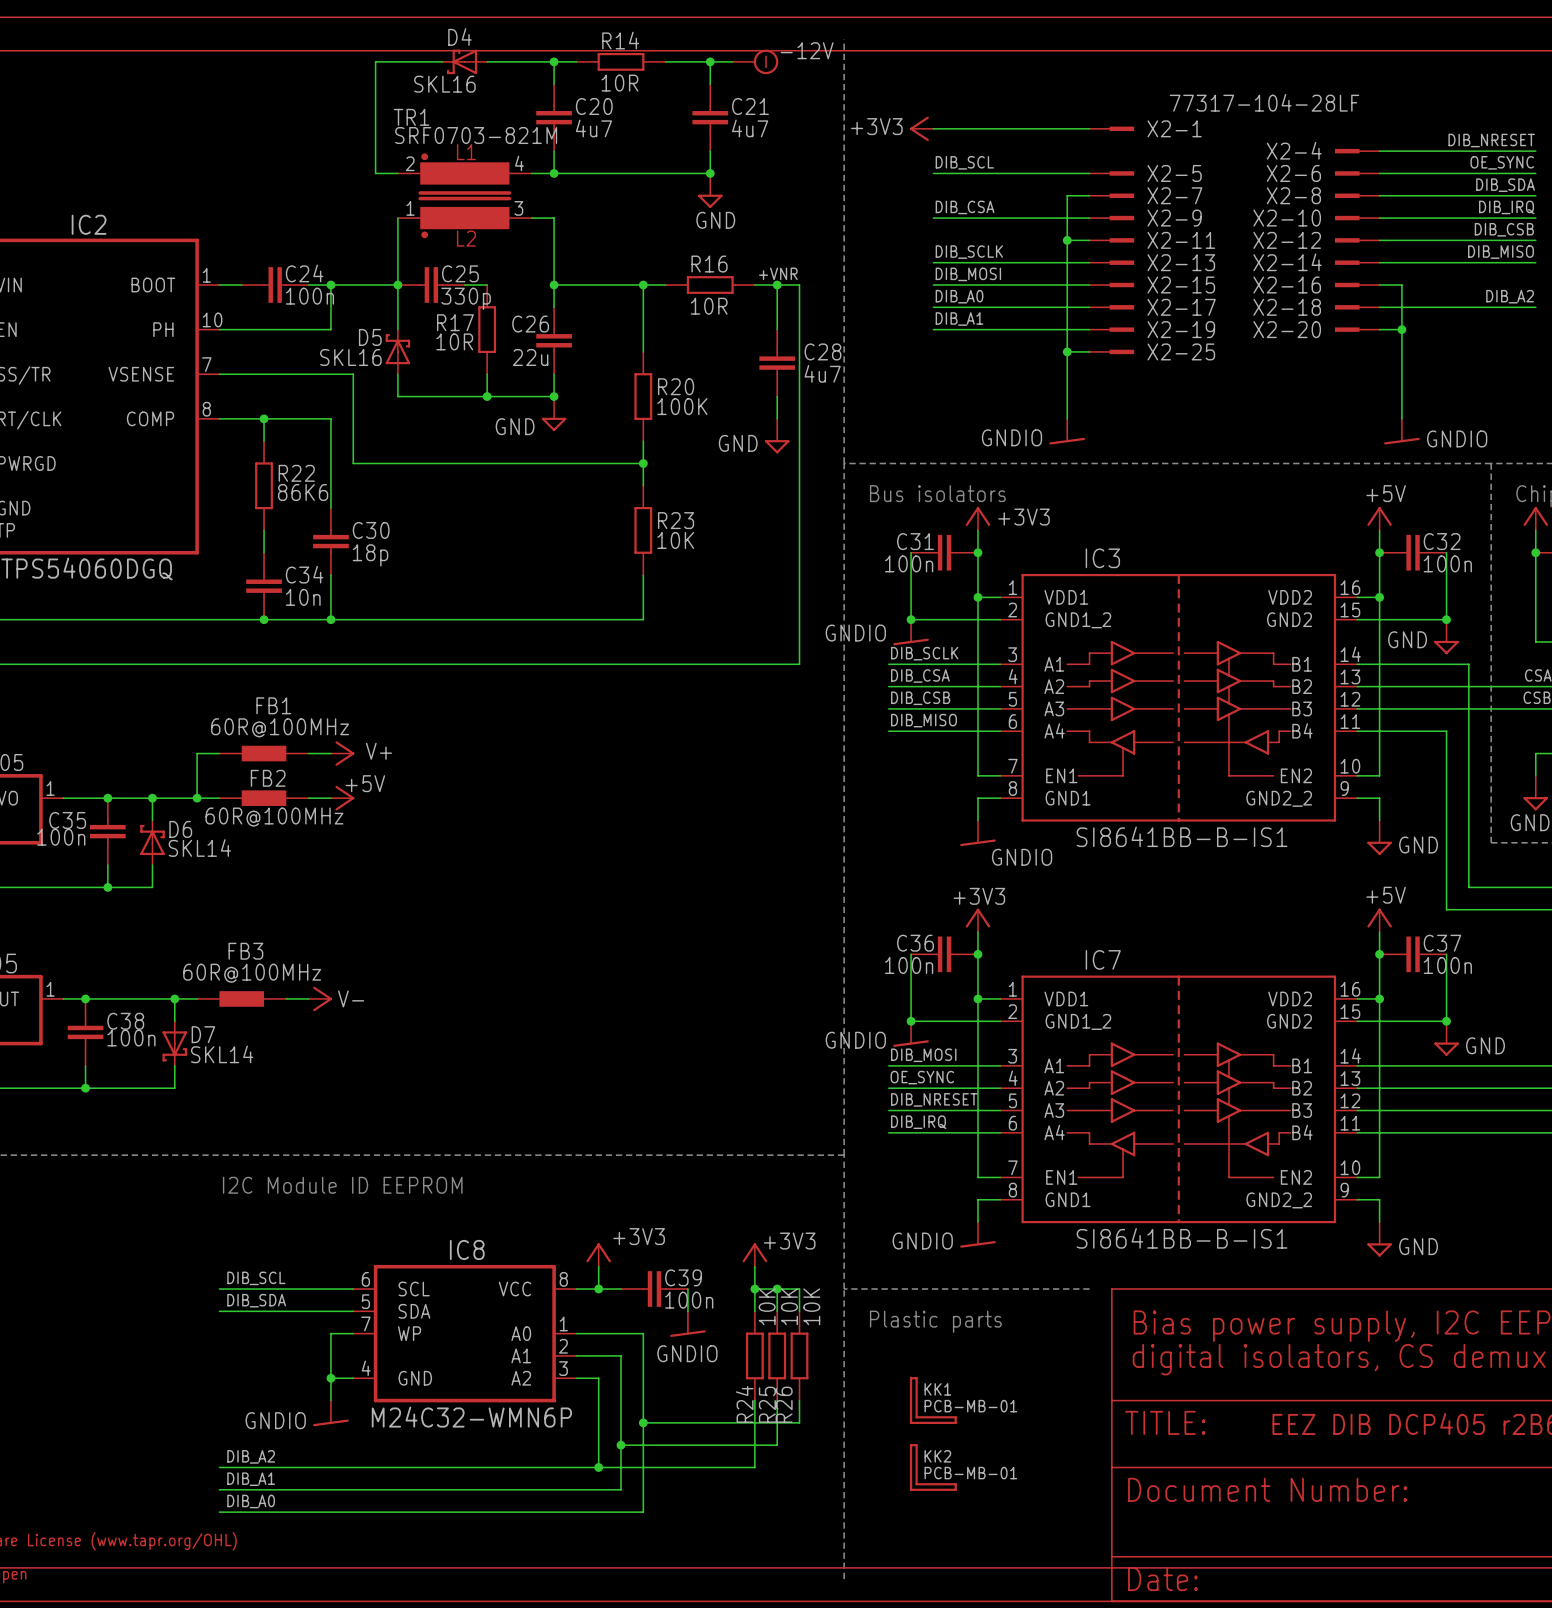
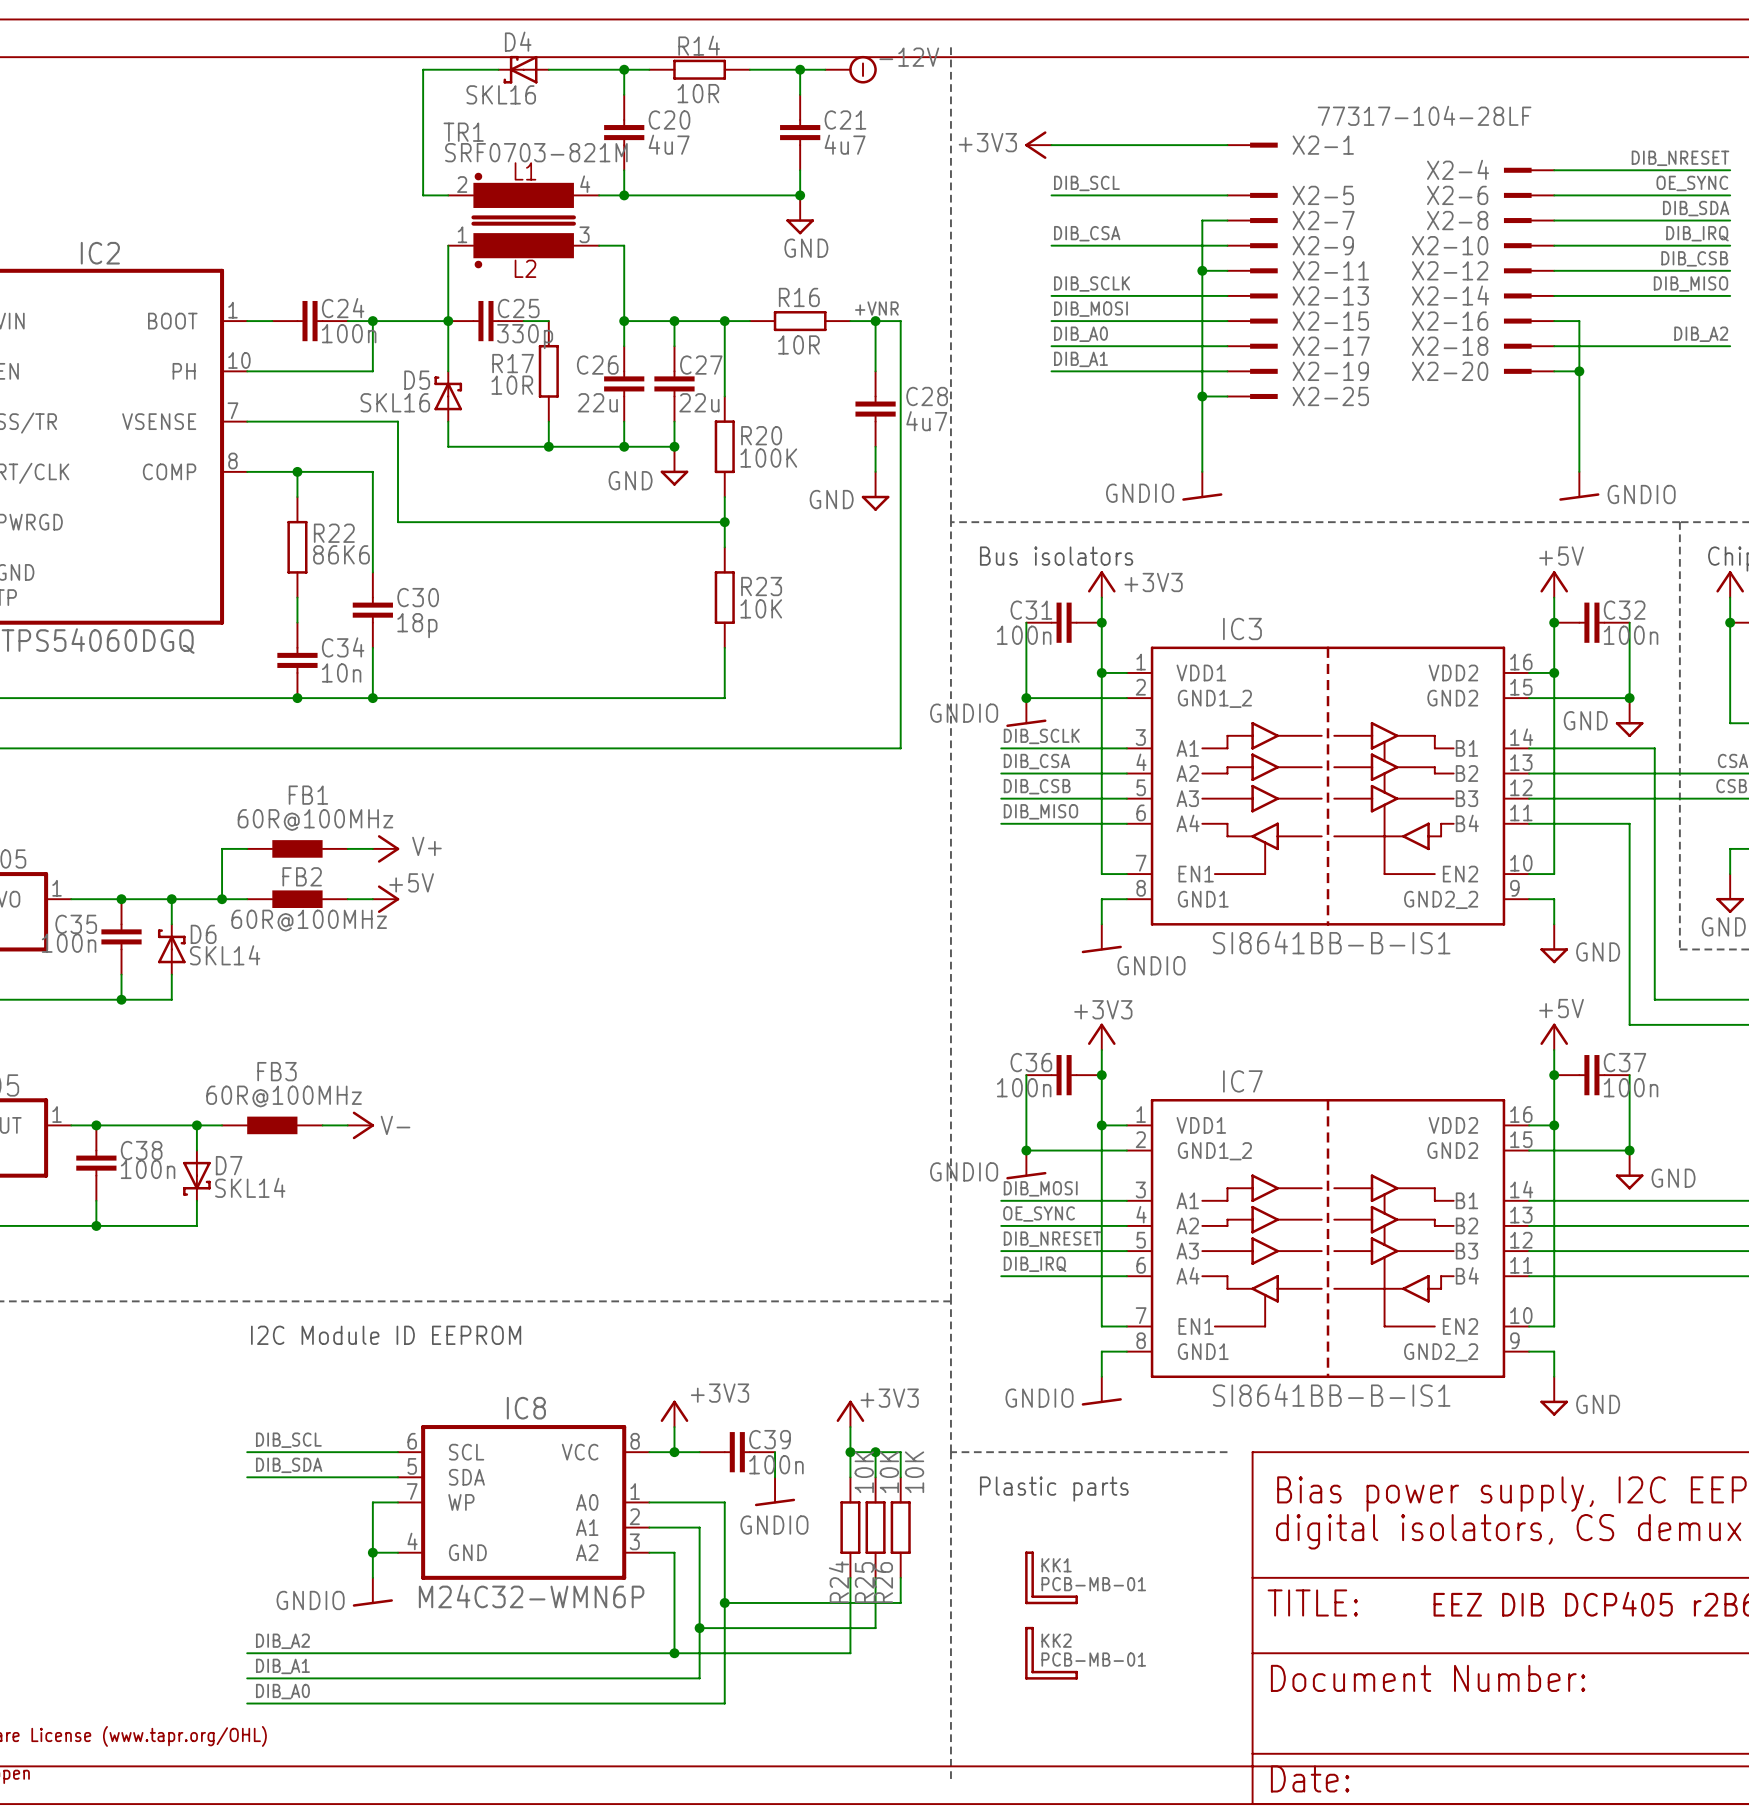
wire: none -> (674, 321) (674, 346)
junction: none -> (674, 321)
C27: none -> 22u (674, 383)
wire: none -> (674, 421) (674, 446) (624, 446)
junction: none -> (674, 446)
power symbol position: GND (554, 413) -> GND (674, 466)

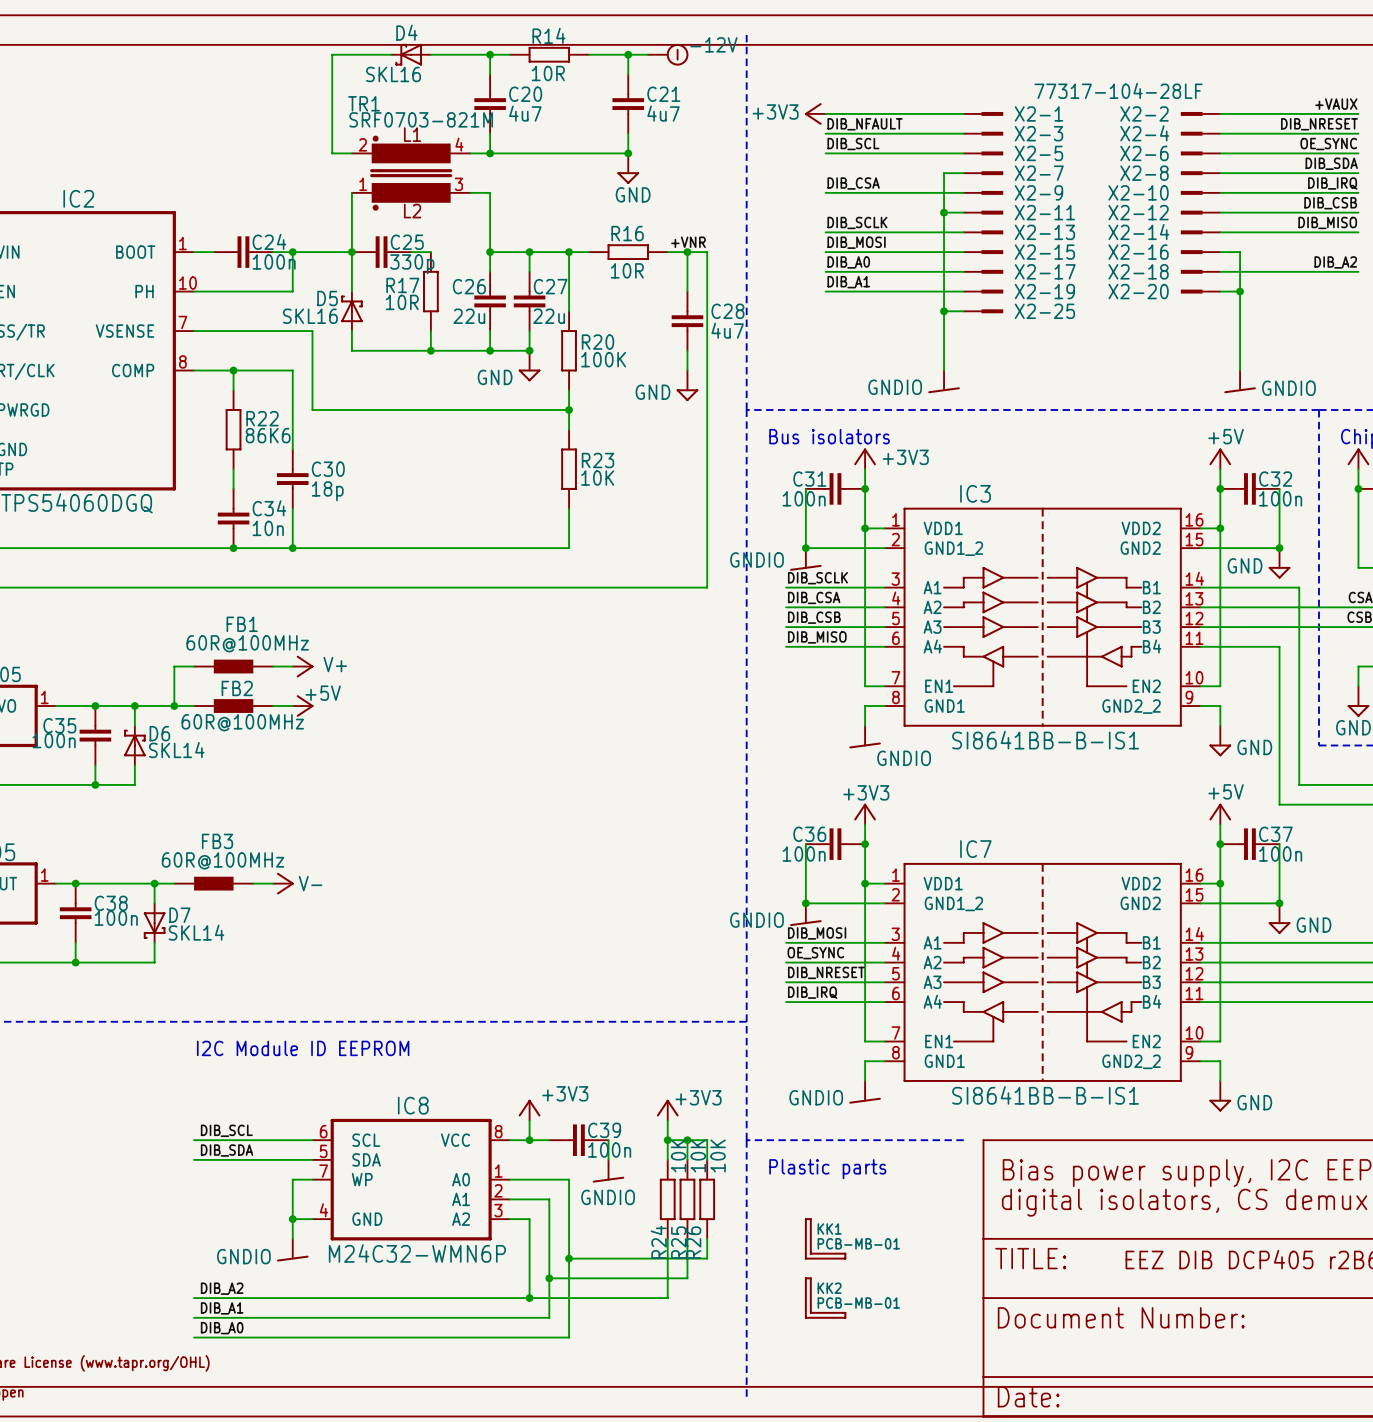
label: none -> +VAUX (1336, 104)
X2-2: none -> (1200, 113)
wire: none -> (1220, 113) (1358, 113)
label: none -> DIB_NFAULT (865, 124)
wire: none -> (825, 133) (963, 133)
X2-3: none -> (983, 133)

